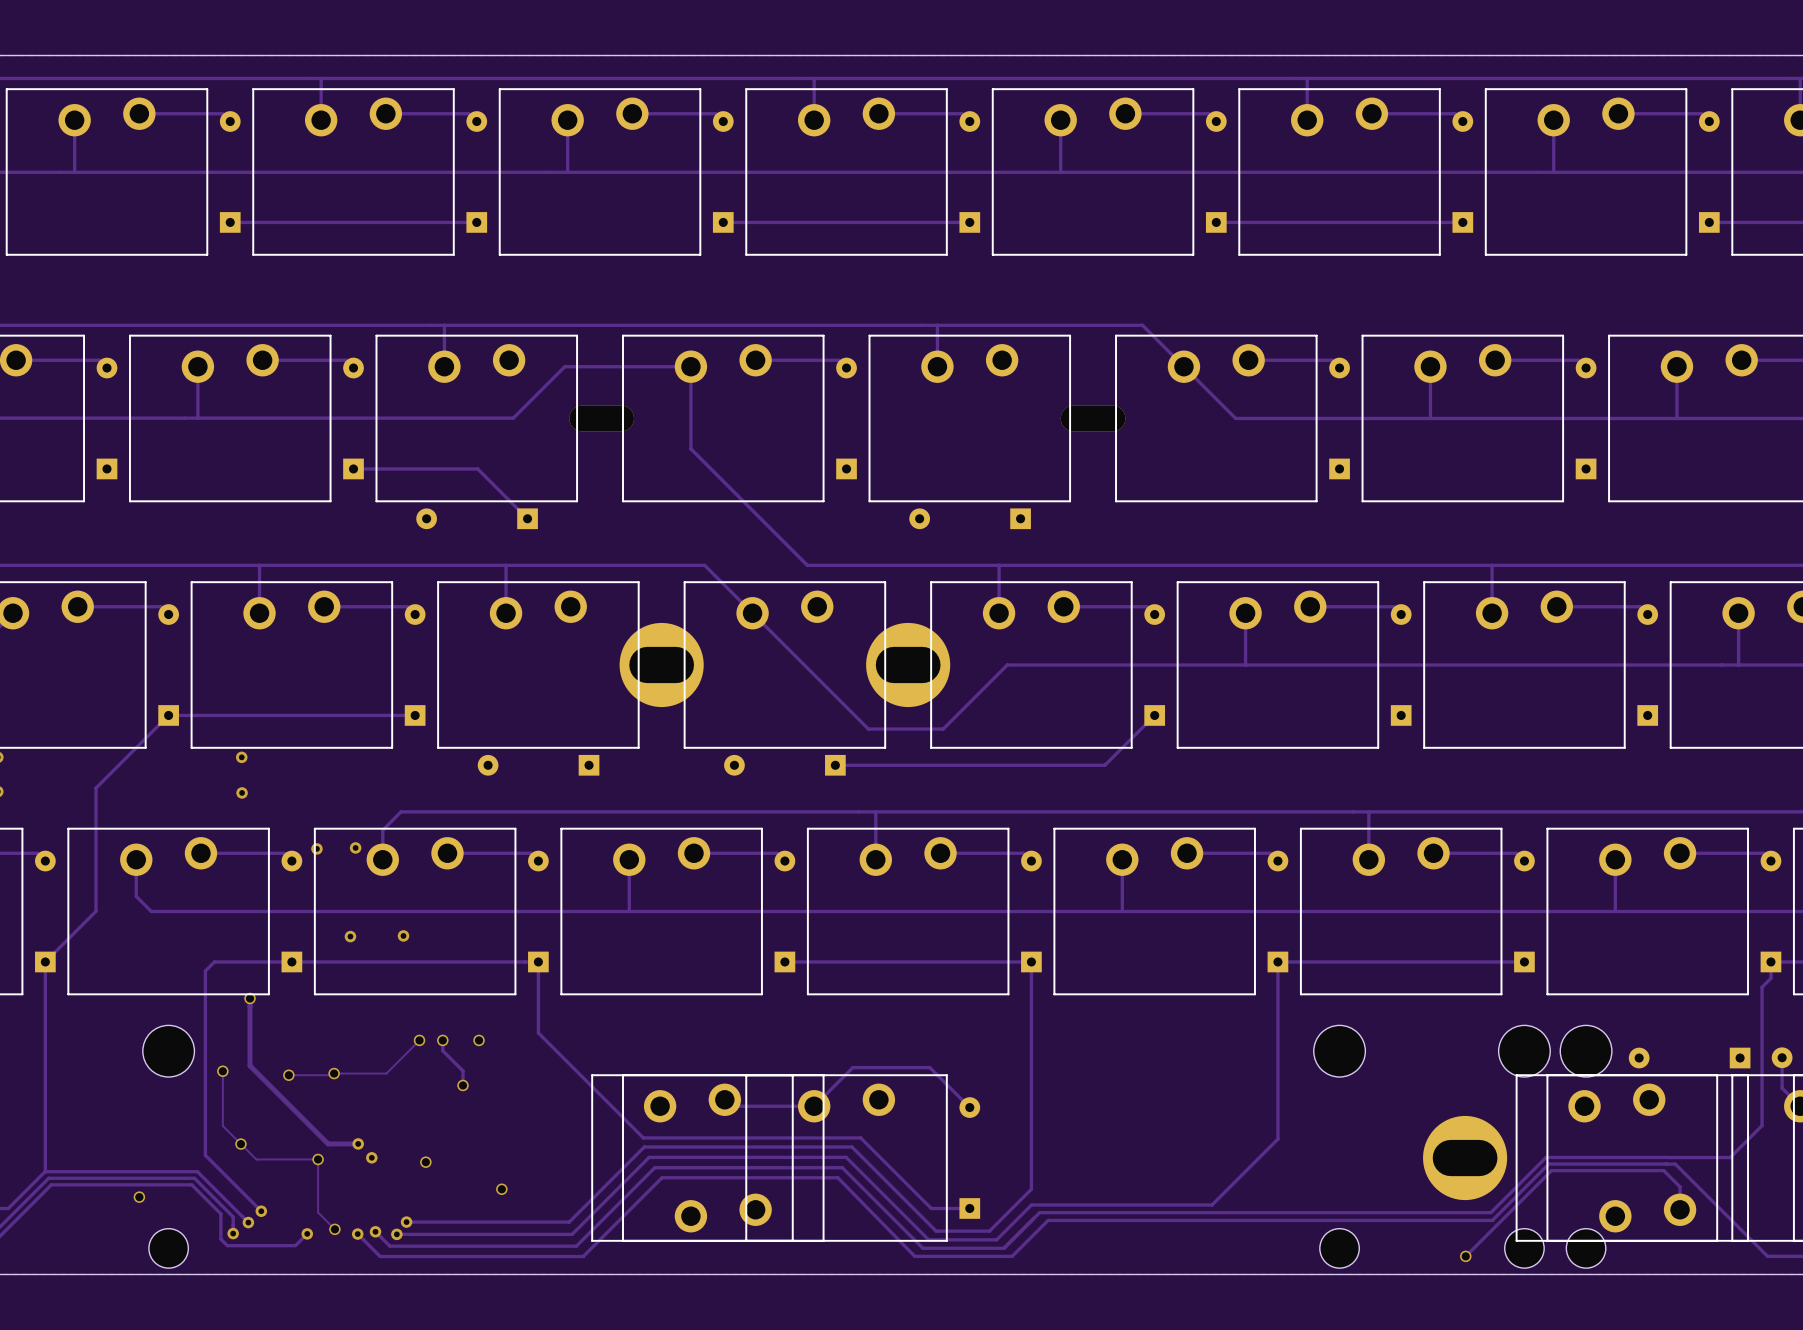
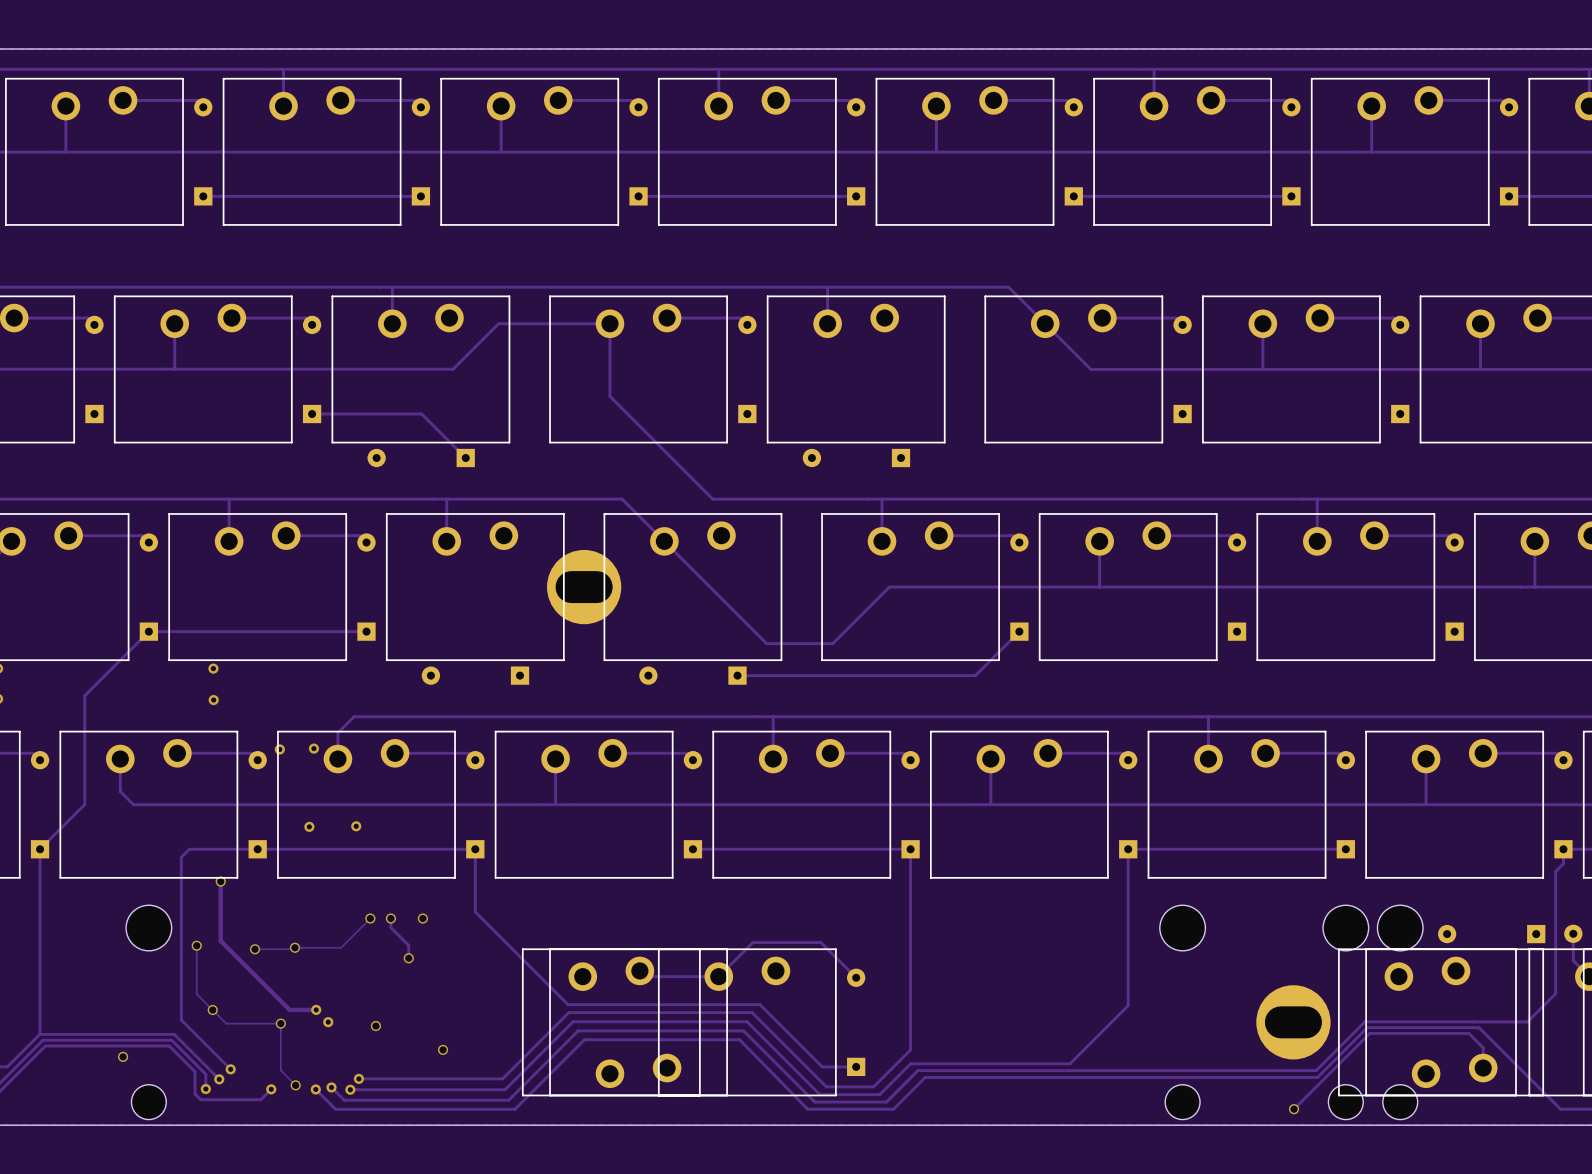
part: (601, 418) -> none
part: (1093, 418) -> none
part: (908, 665) -> none

